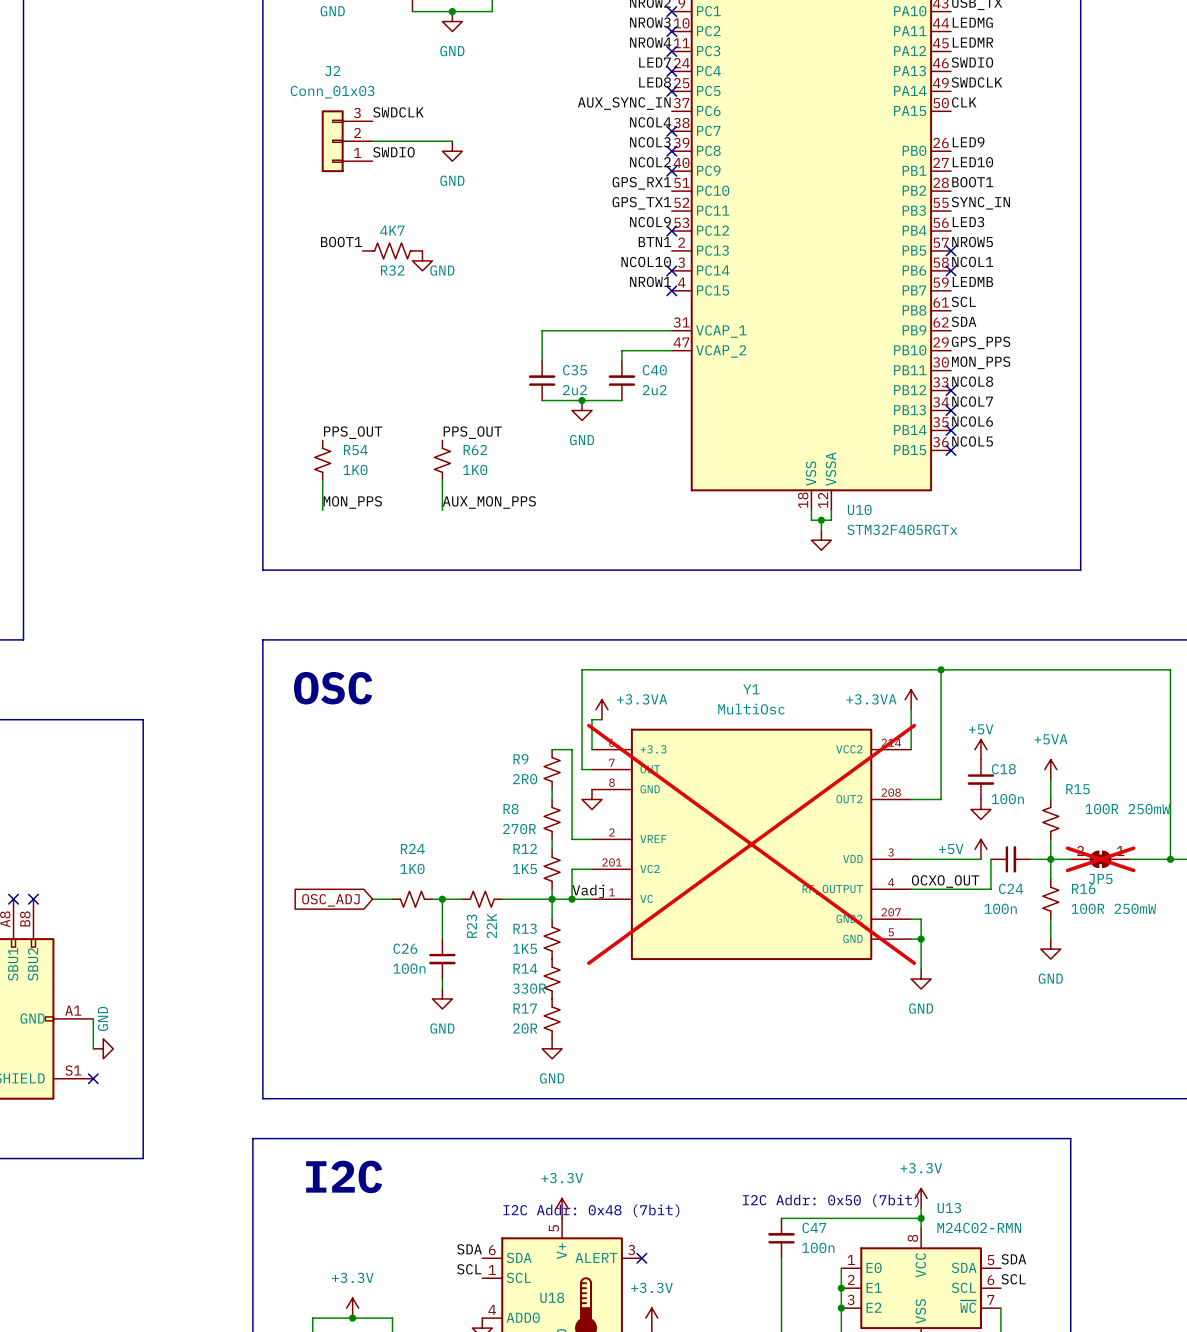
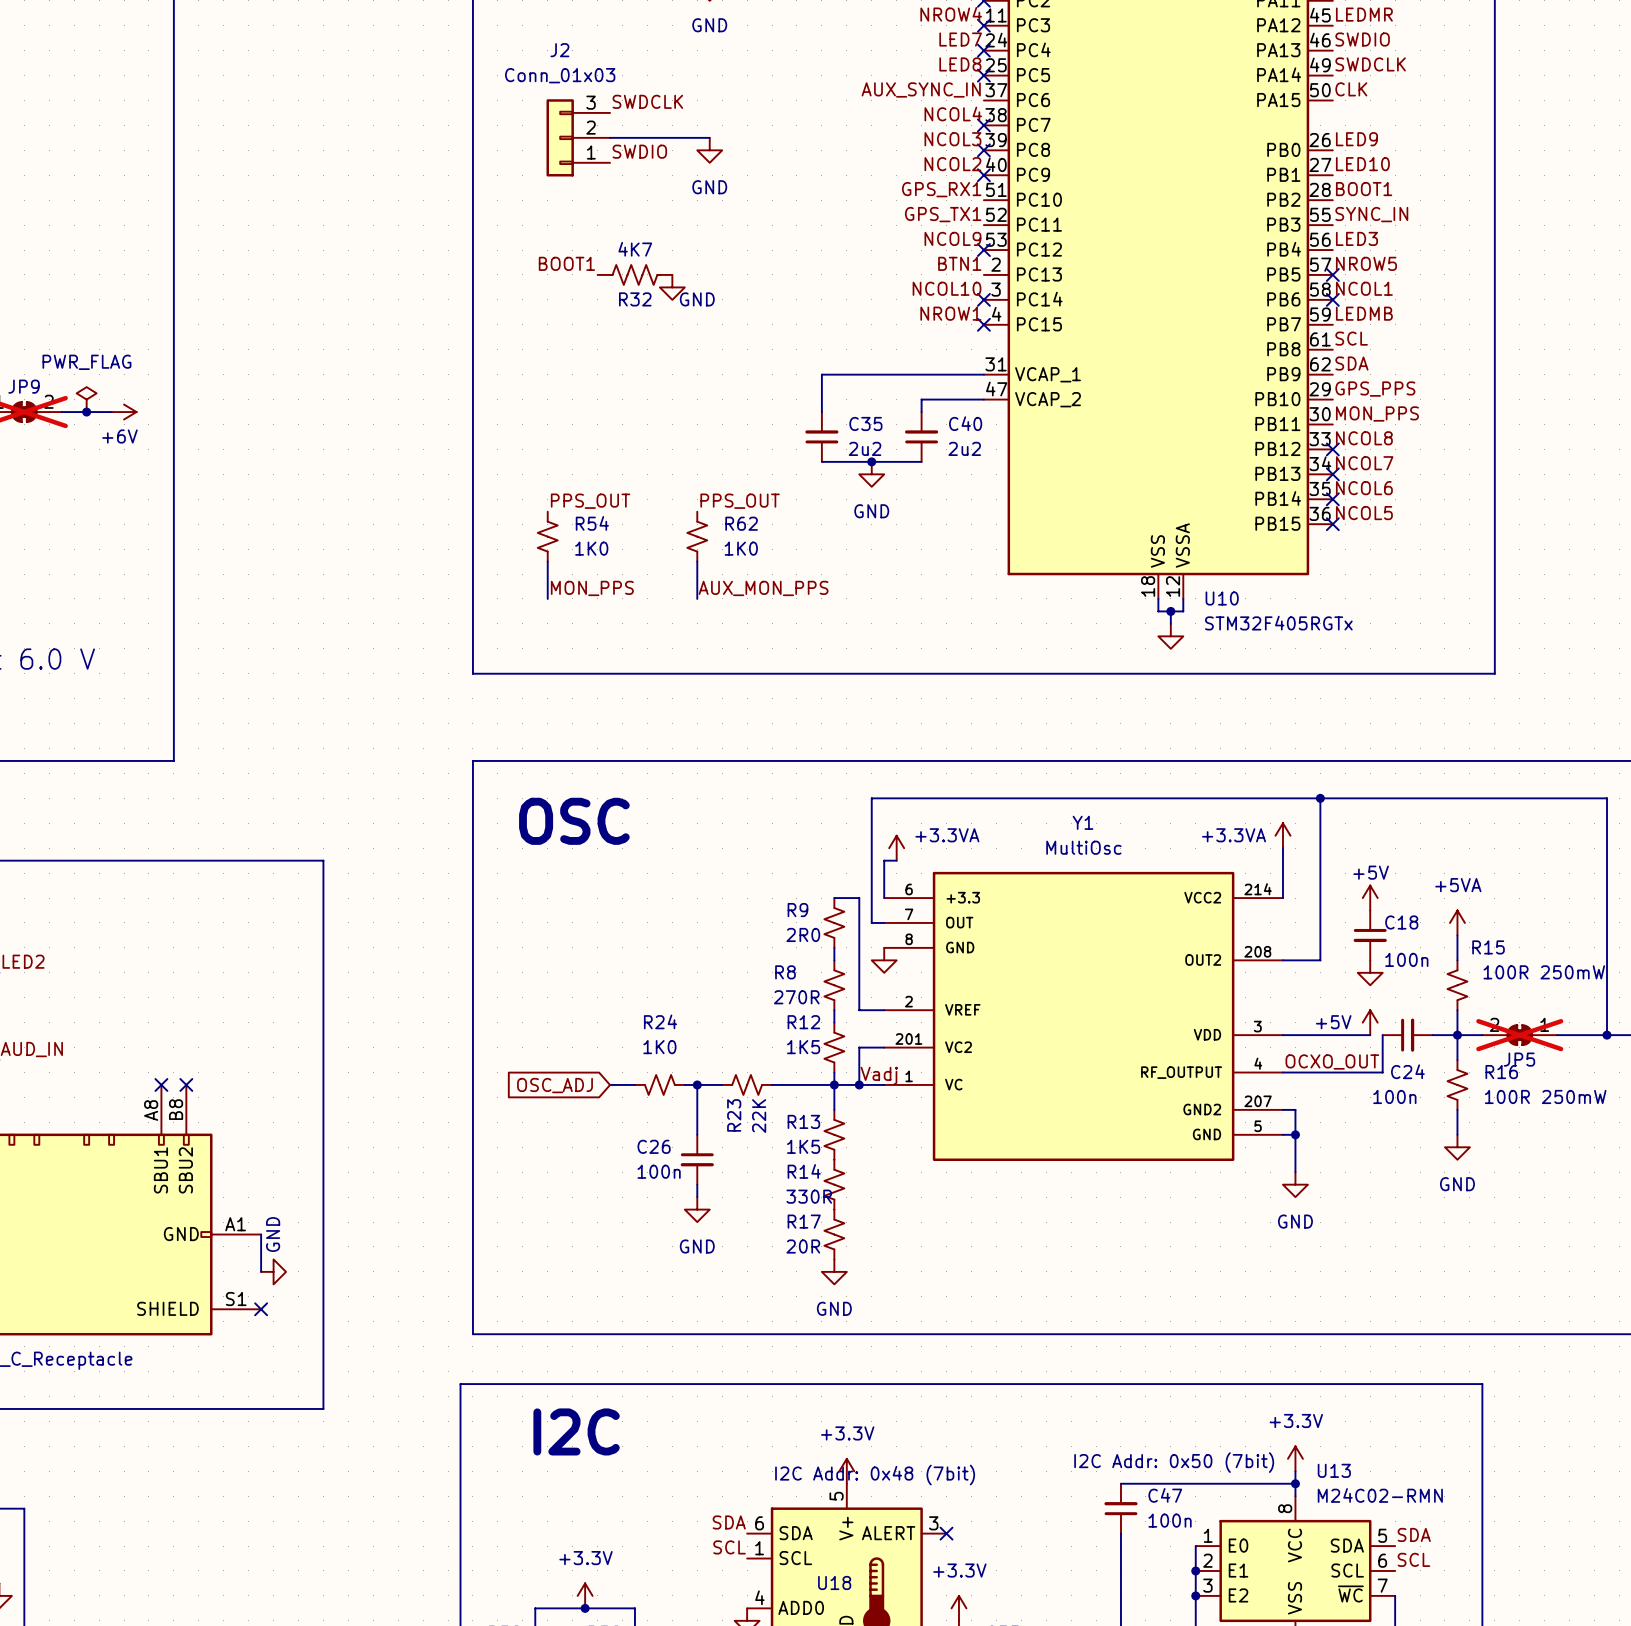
Y1 do-not-place cross: (751, 844) -> none

